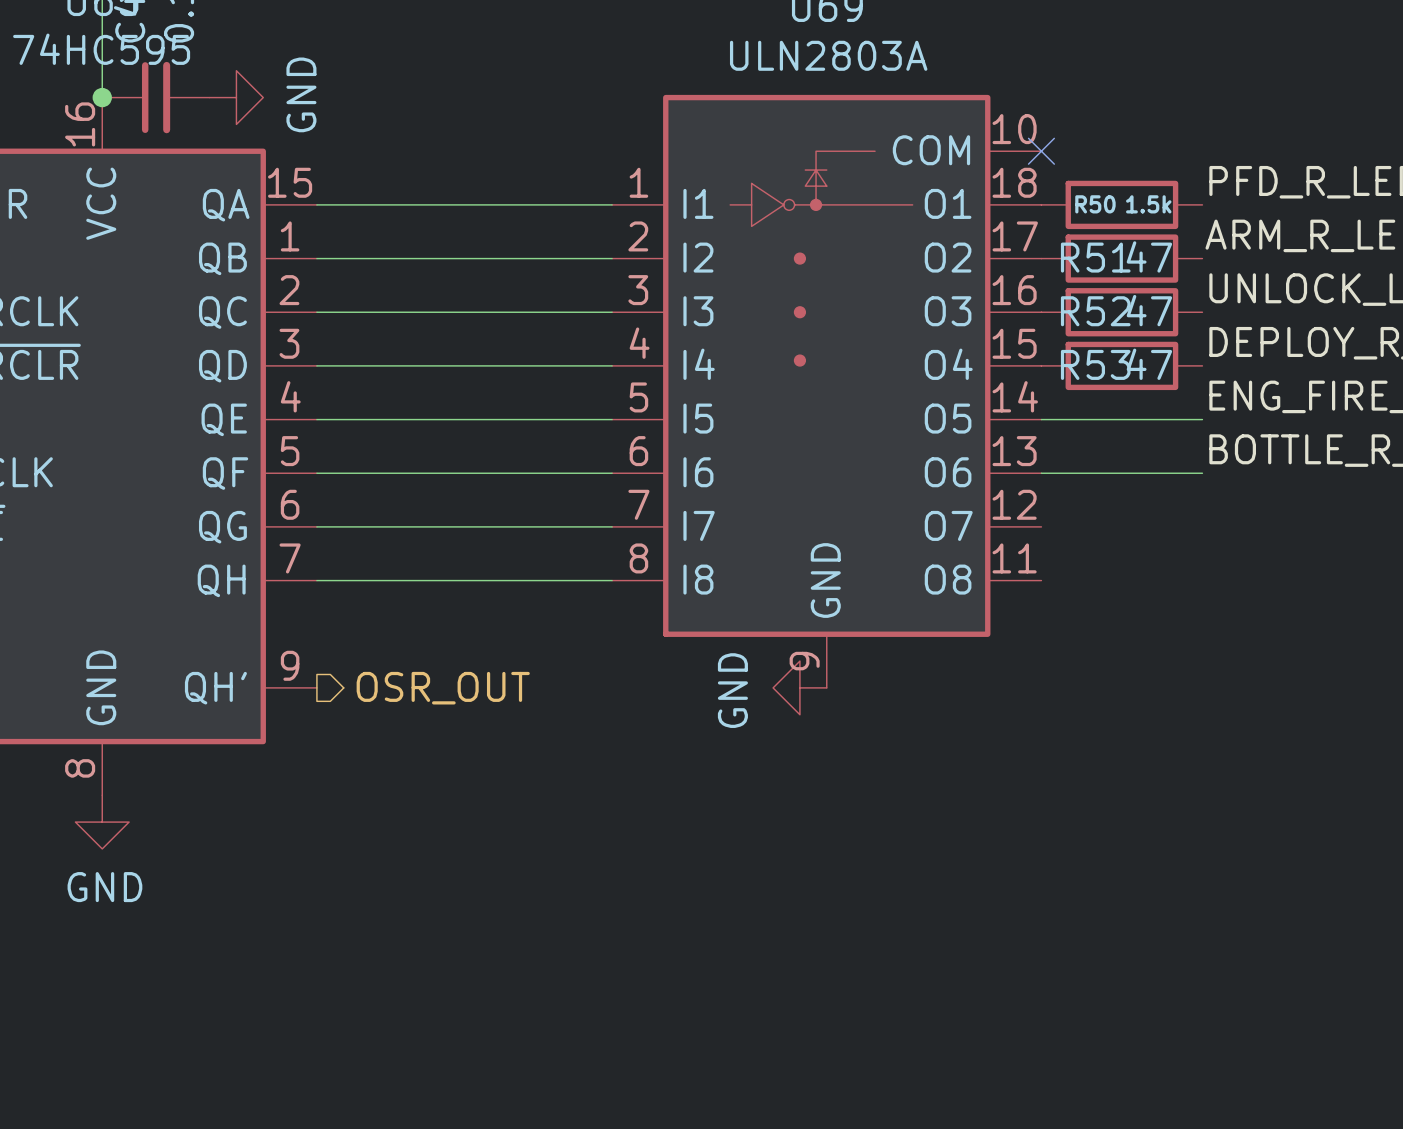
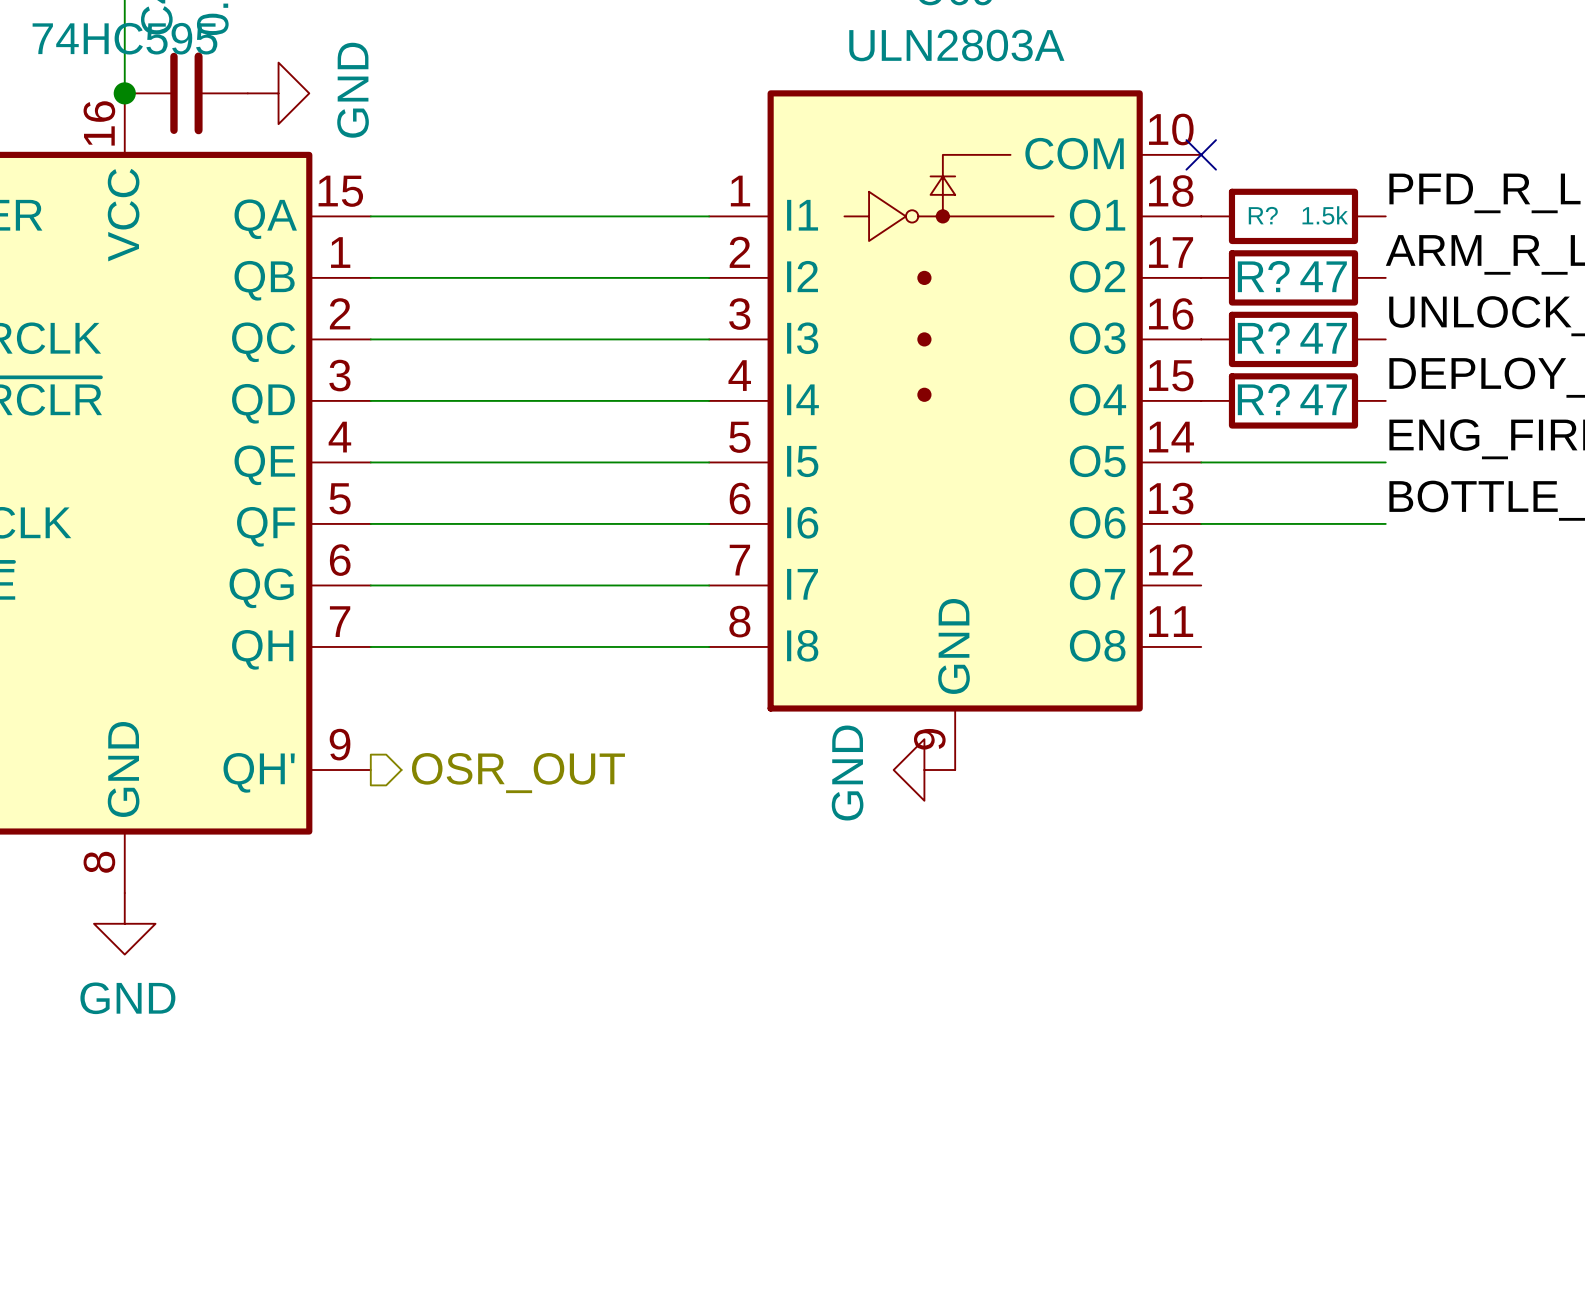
R50 name: R50 (1095, 204) -> R? (1263, 215)
R51 name: R51 (1095, 257) -> R? (1263, 276)
R52 name: R52 (1095, 311) -> R? (1263, 338)
R53 name: R53 (1095, 364) -> R? (1263, 399)

